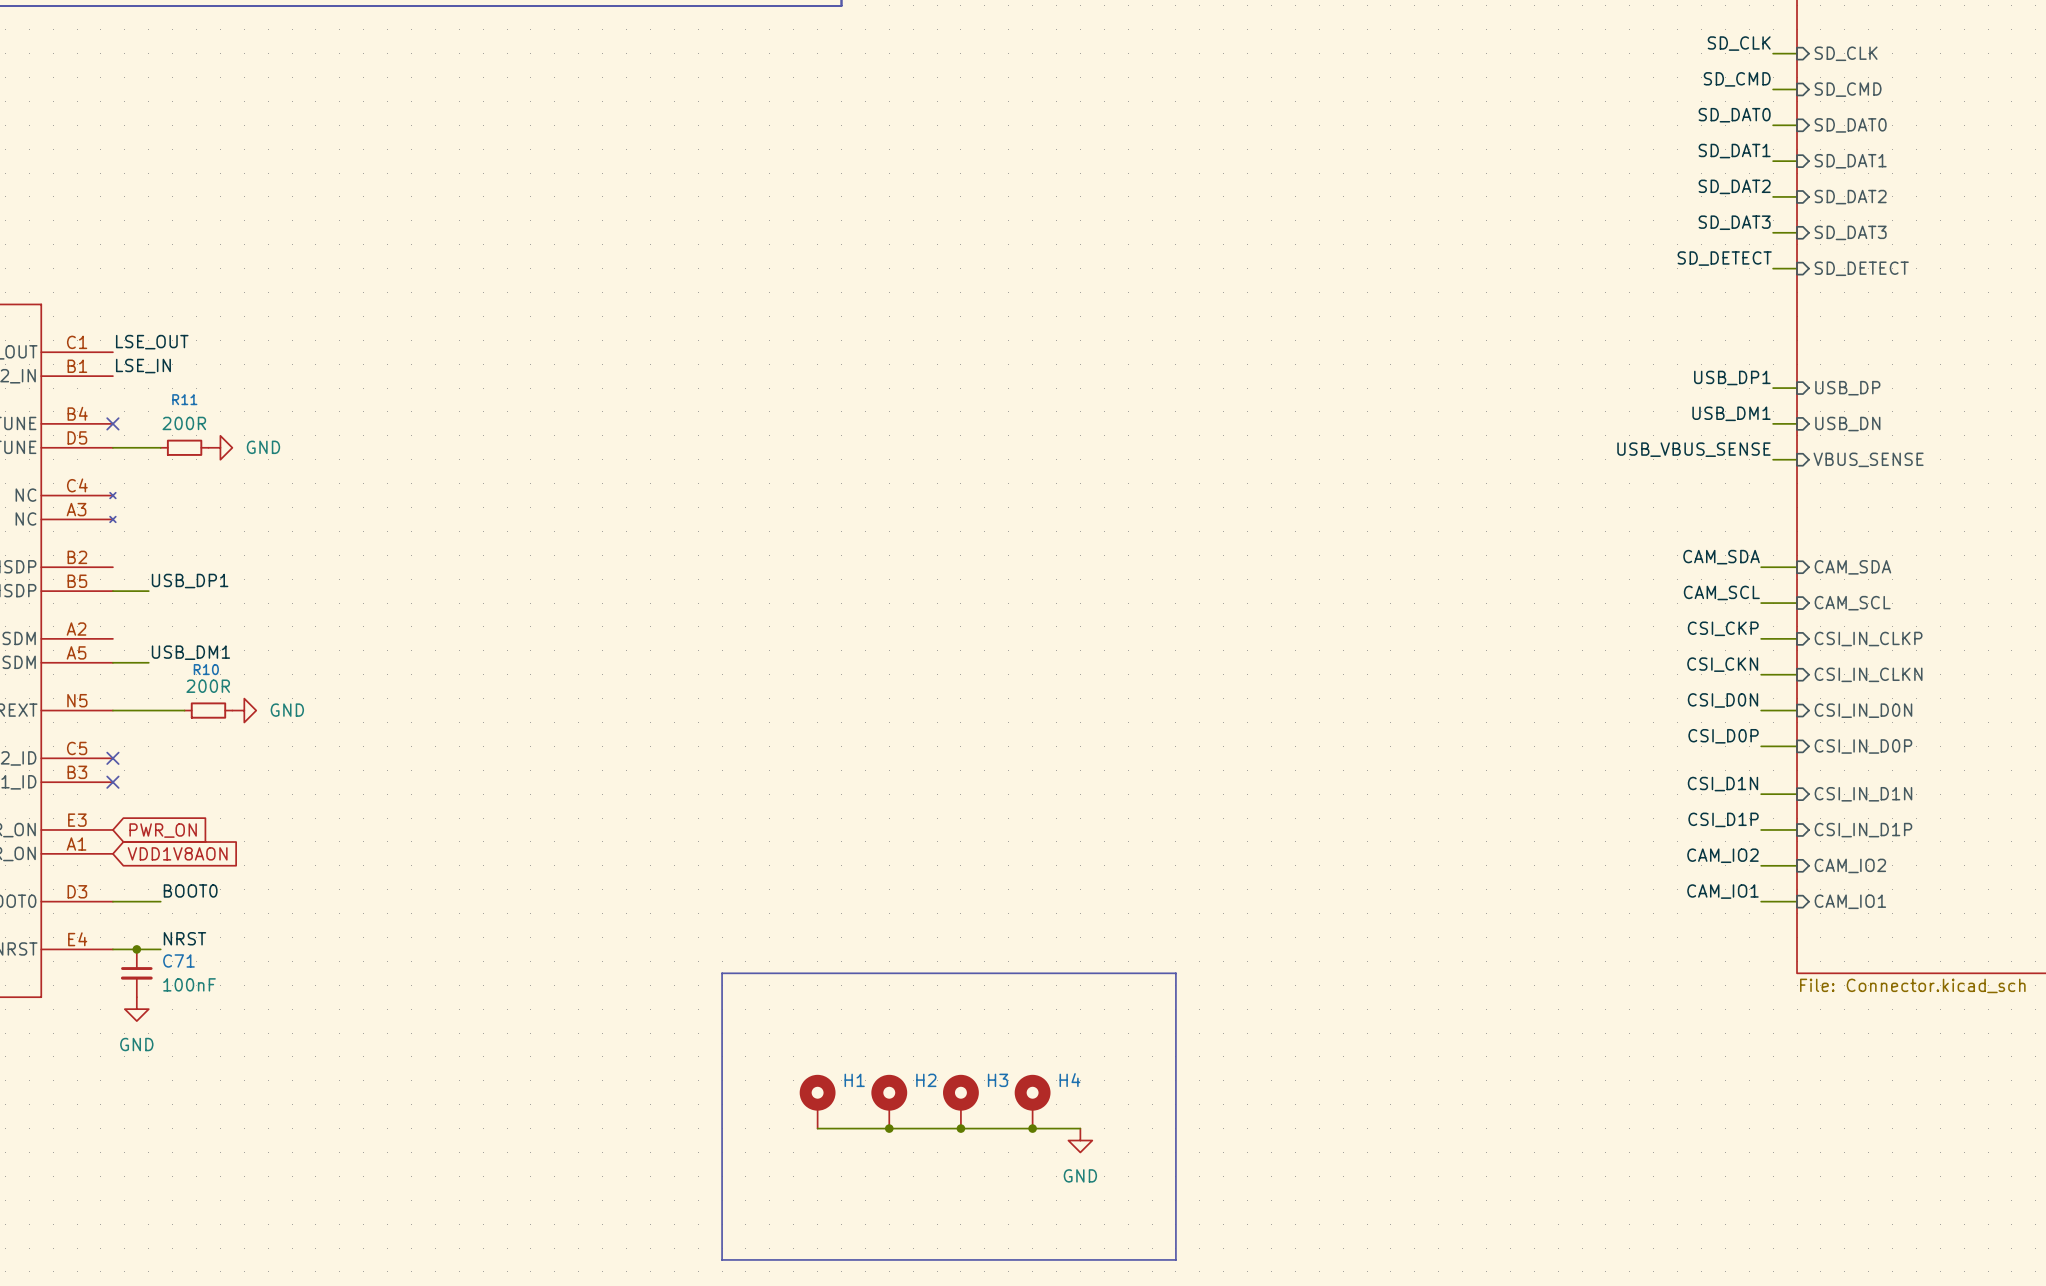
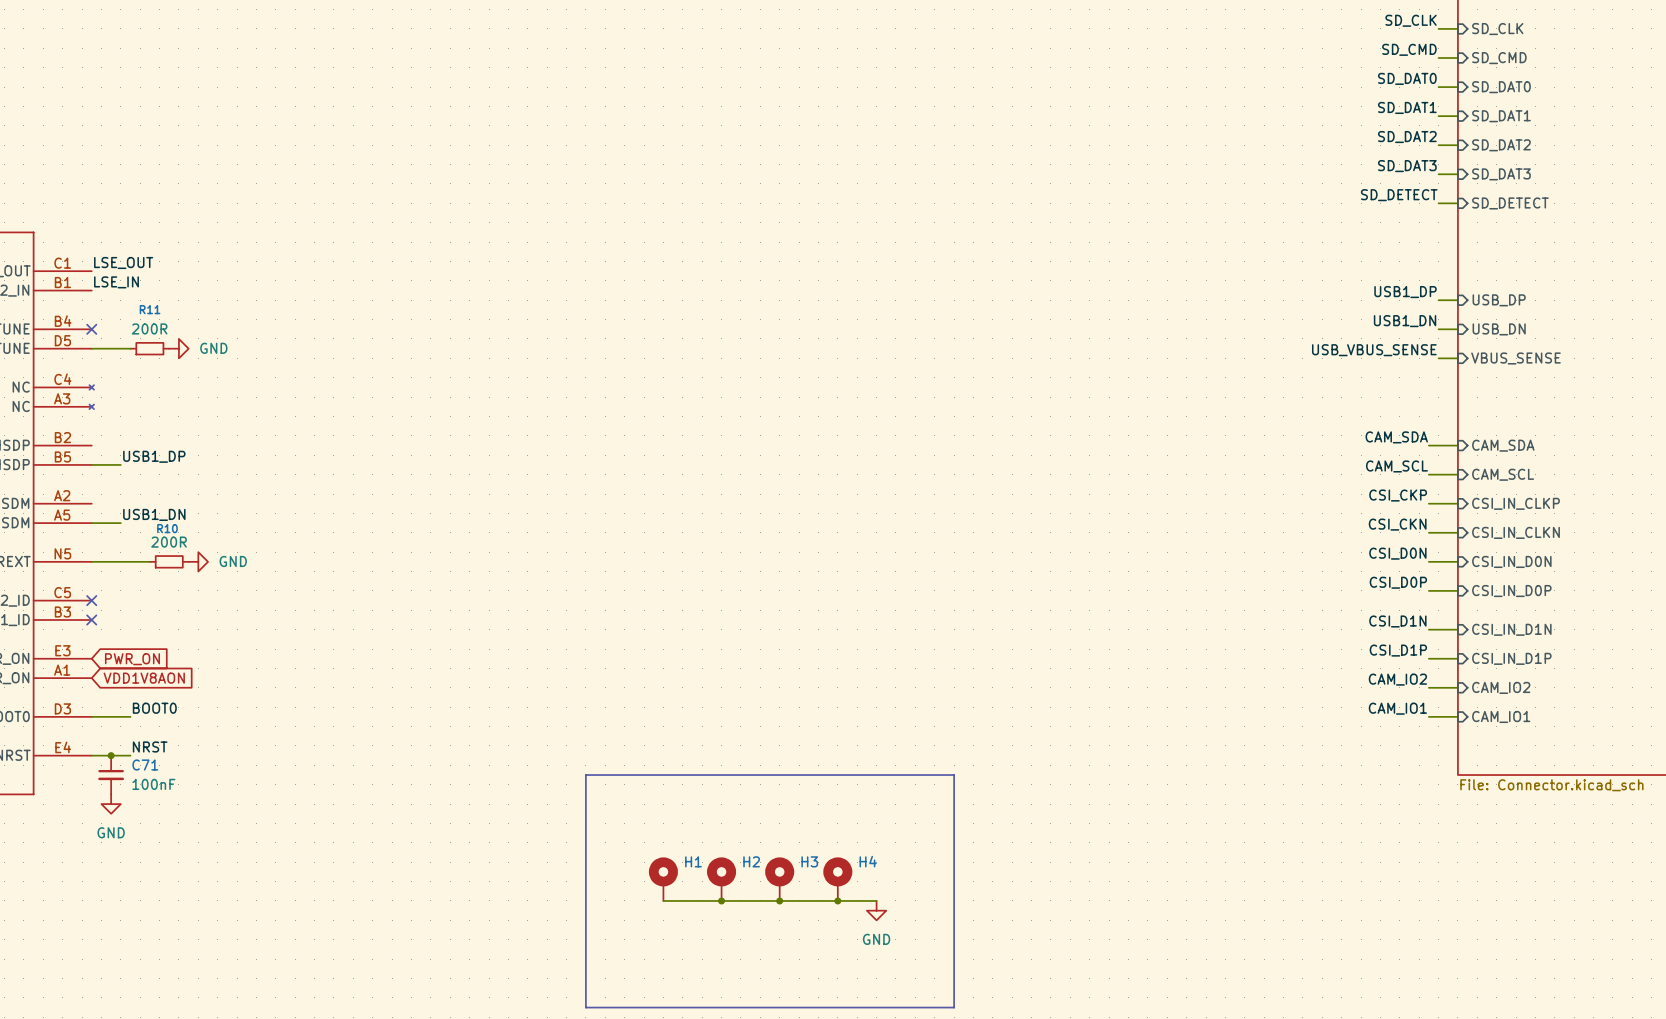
label: USB_DP1 (1732, 377) -> USB1_DP (1405, 292)
label: USB_DM1 (1731, 413) -> USB1_DN (1405, 321)
label: USB_DP1 (190, 581) -> USB1_DP (154, 456)
label: USB_DM1 (190, 652) -> USB1_DN (154, 514)

